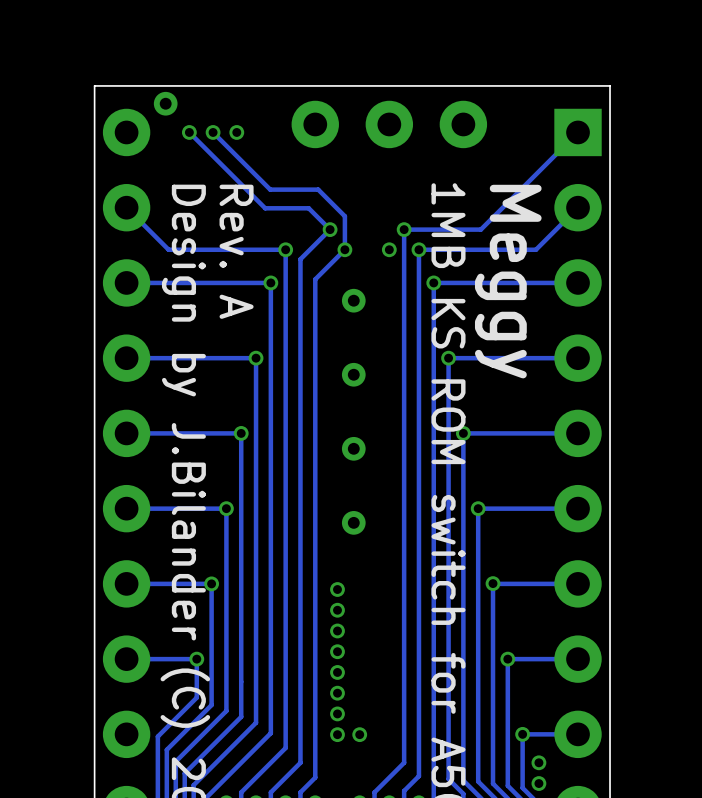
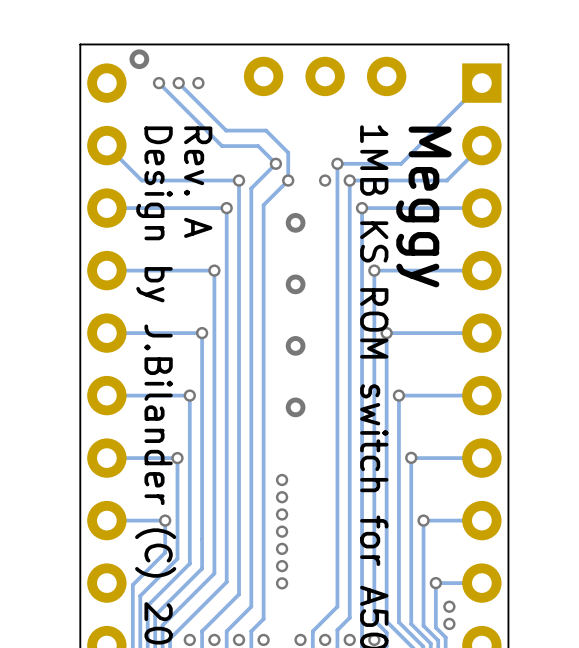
via: (337, 589) -> none
via: (359, 734) -> none

